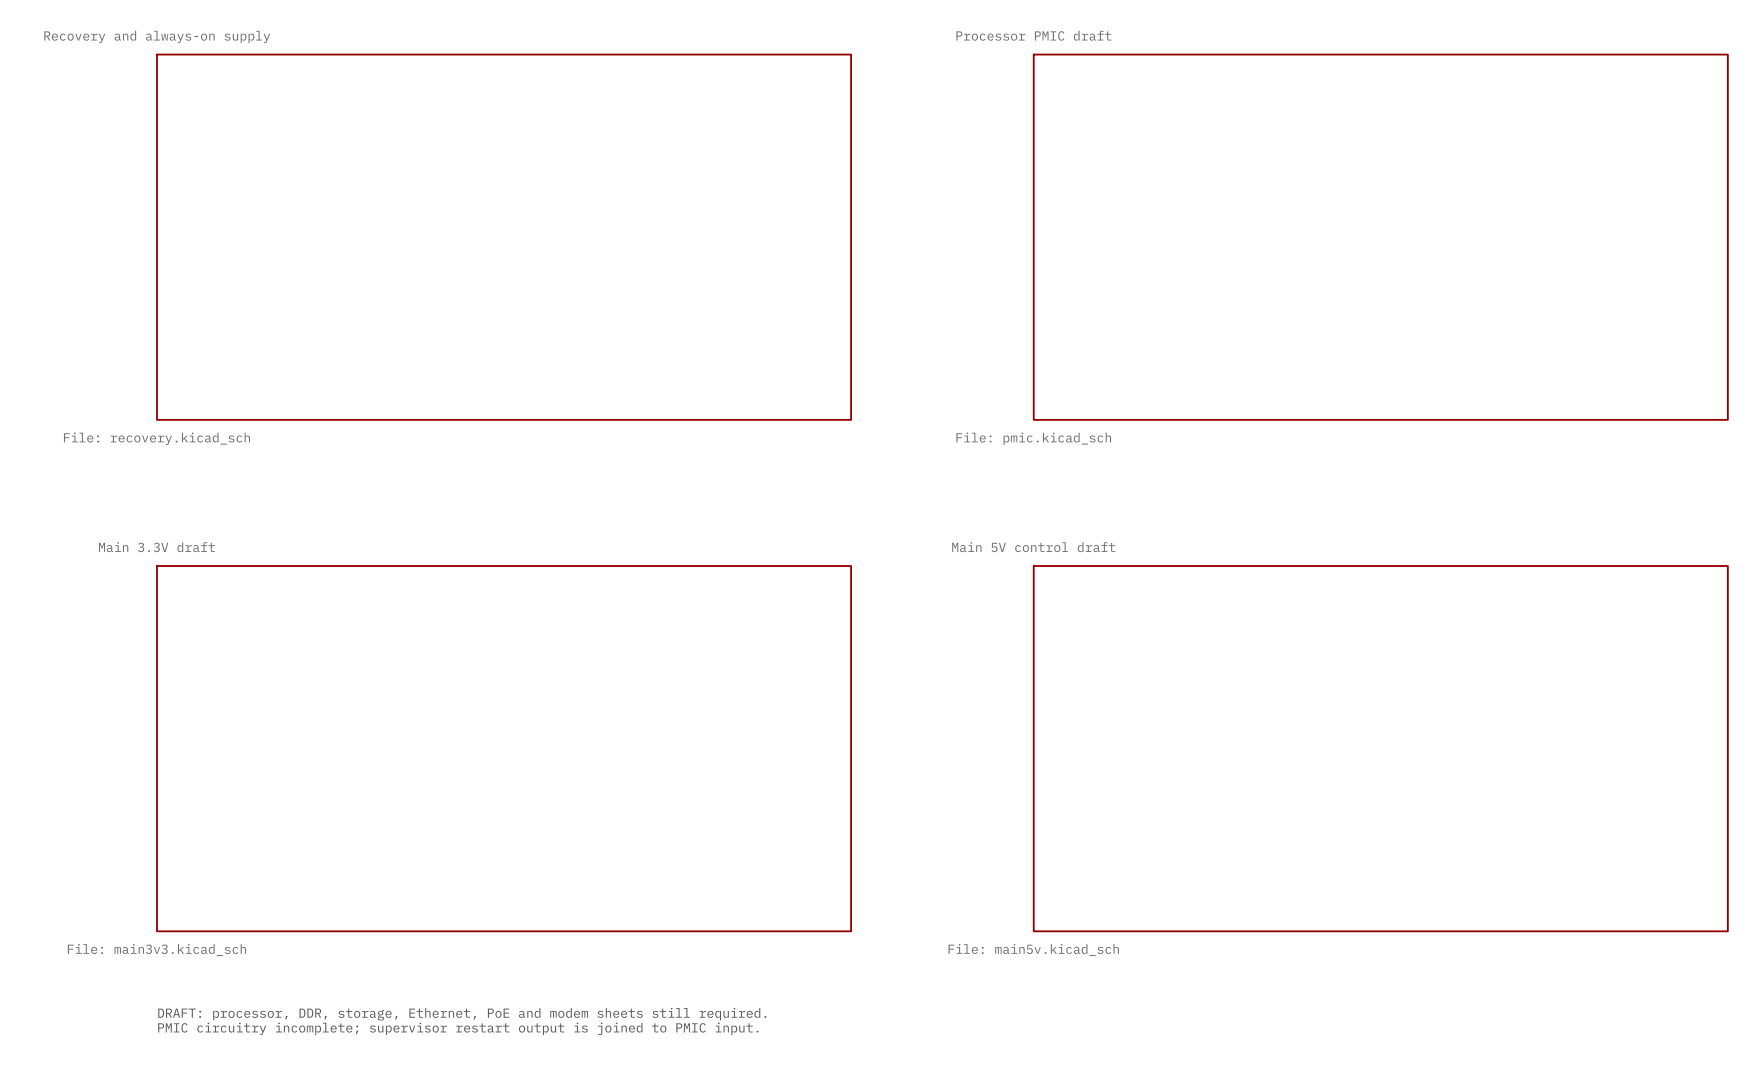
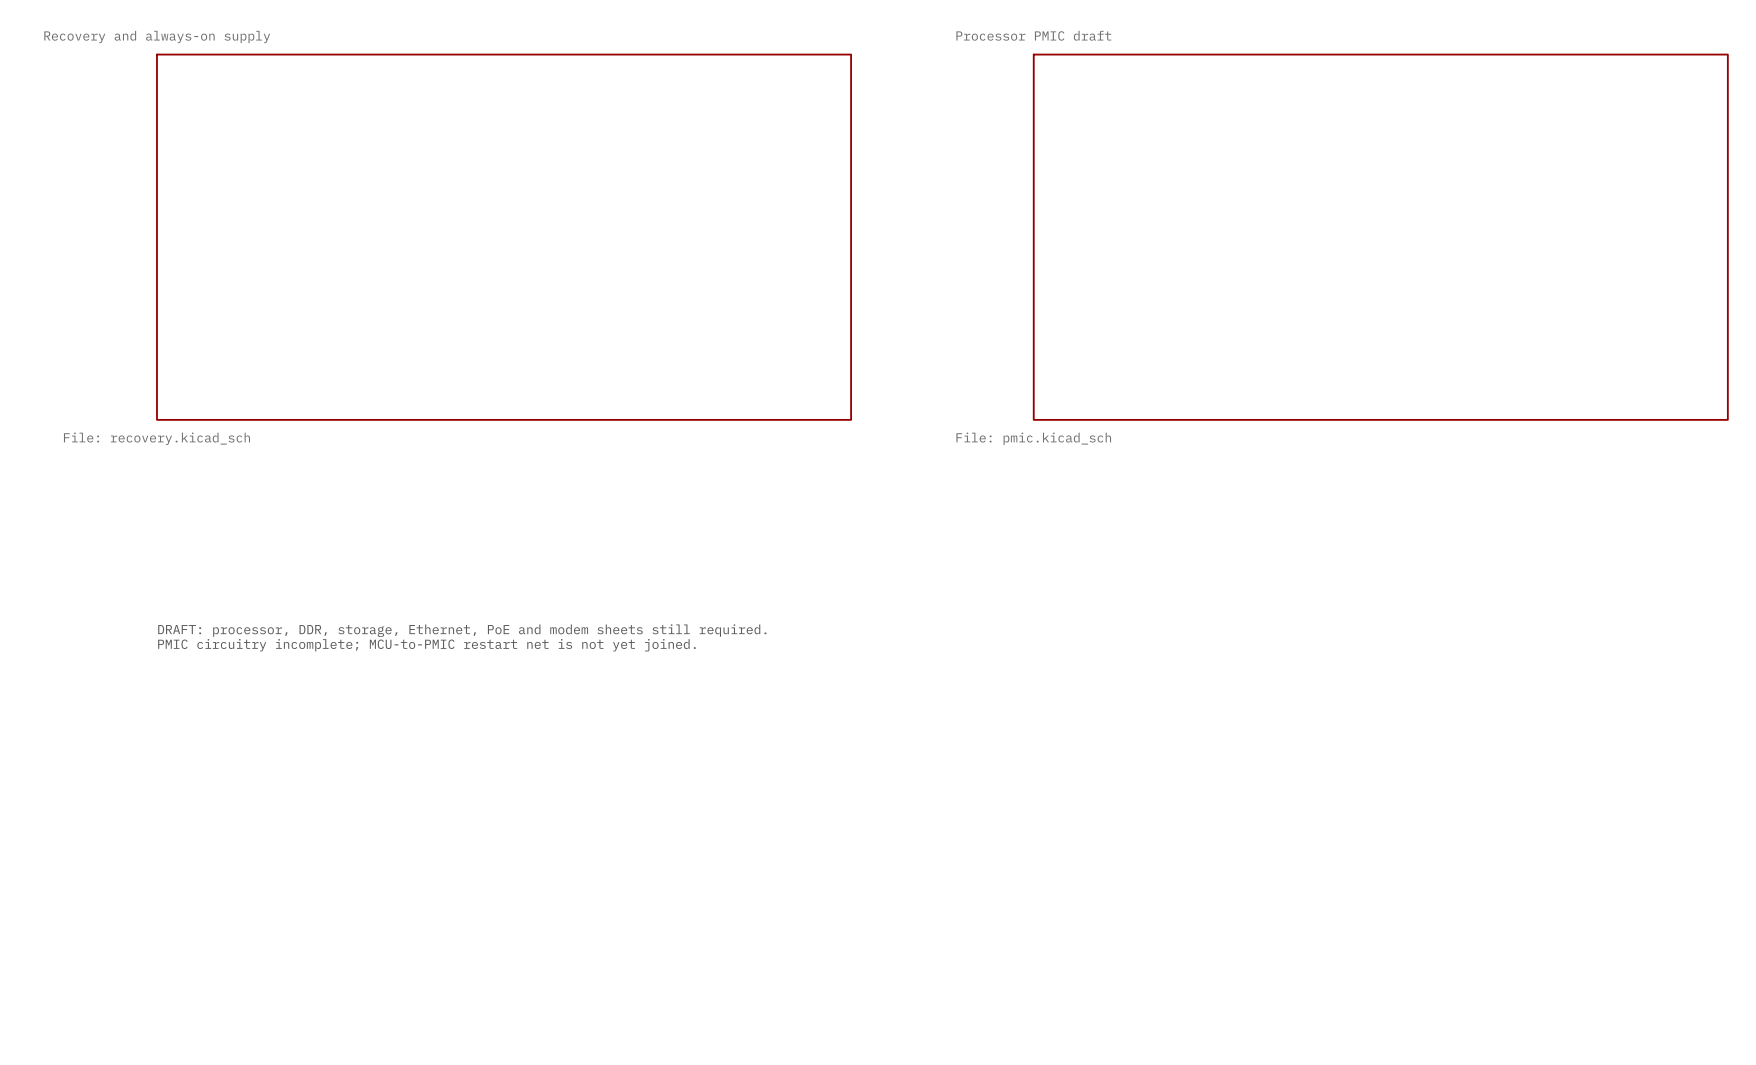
text: none -> DRAFT: processor, DDR, storage, Ethernet, PoE and modem sheets still required. (462, 630)
text: none -> PMIC circuitry incomplete; MCU-to-PMIC restart net is not yet joined. (426, 645)
sheet Main 3.3V draft: File: main3v3.kicad_sch (504, 748) -> none
sheet Main 5V control draft: File: main5v.kicad_sch (1380, 748) -> none
text: DRAFT: processor, DDR, storage, Ethernet, PoE and modem sheets still required. (462, 1014) -> none
text: PMIC circuitry incomplete; supervisor restart output is joined to PMIC input. (458, 1028) -> none

